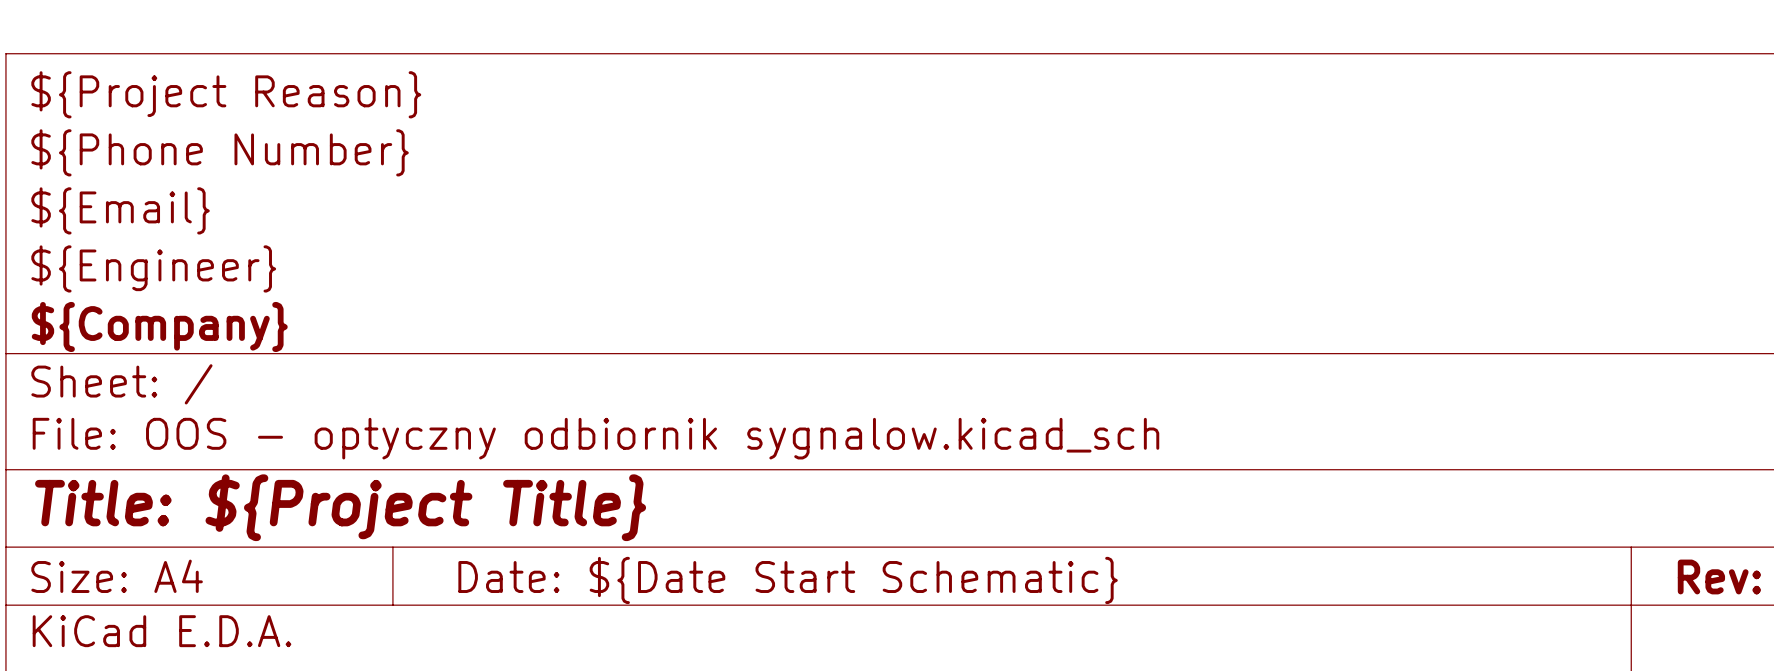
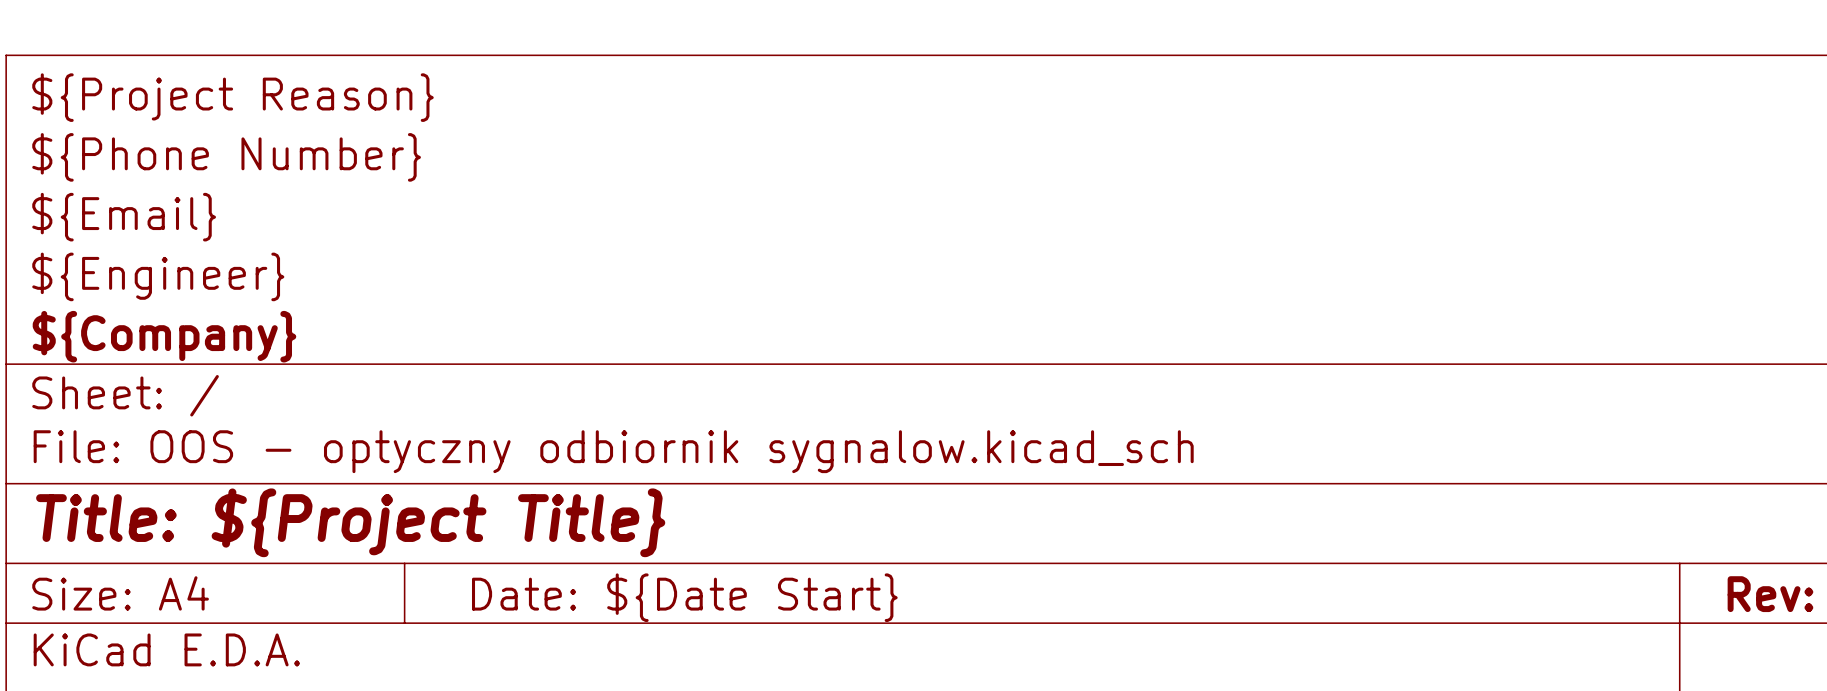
title block: Date: ${Date Start Schematic} (788, 580) -> Date: ${Date Start} (684, 597)

